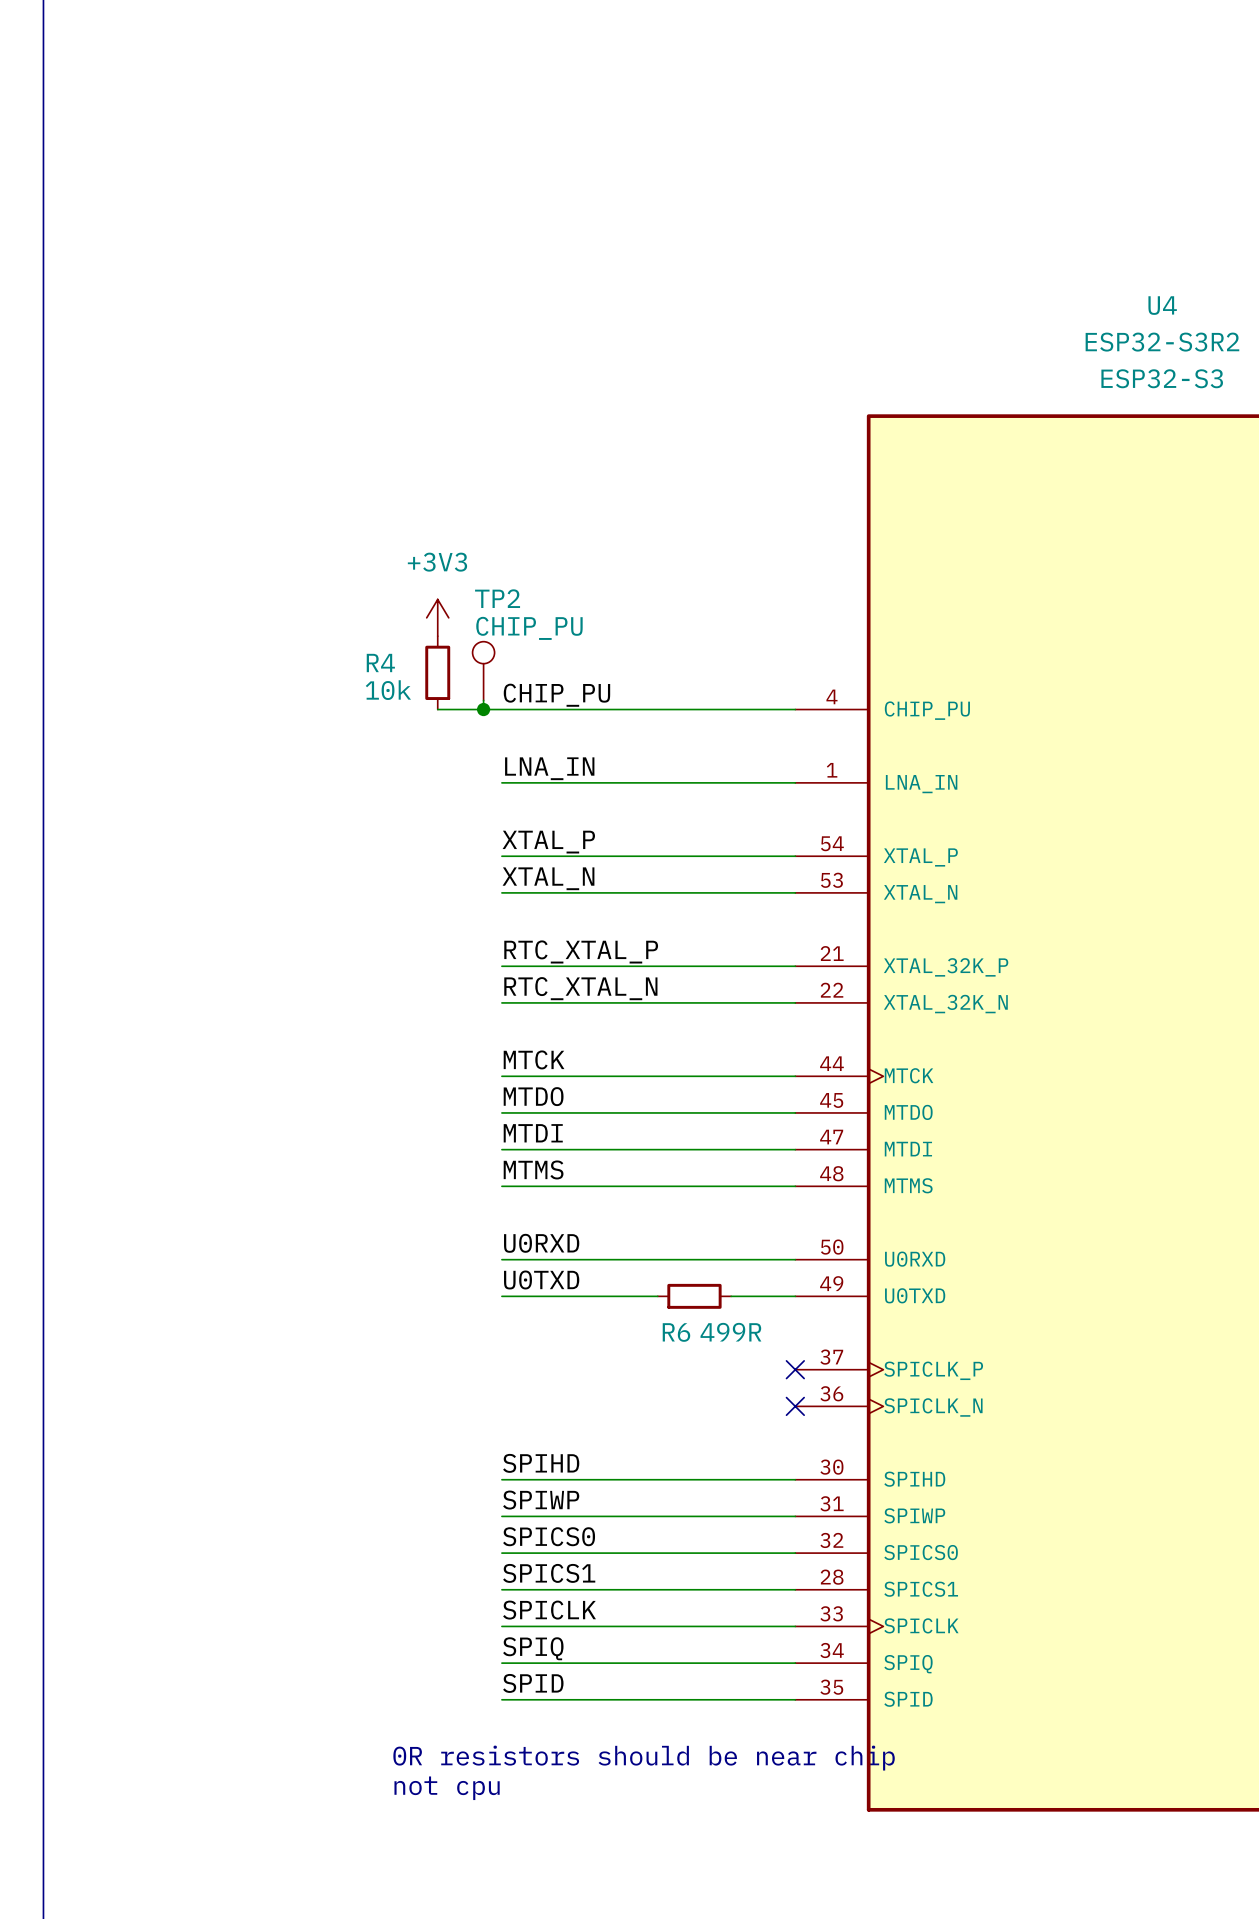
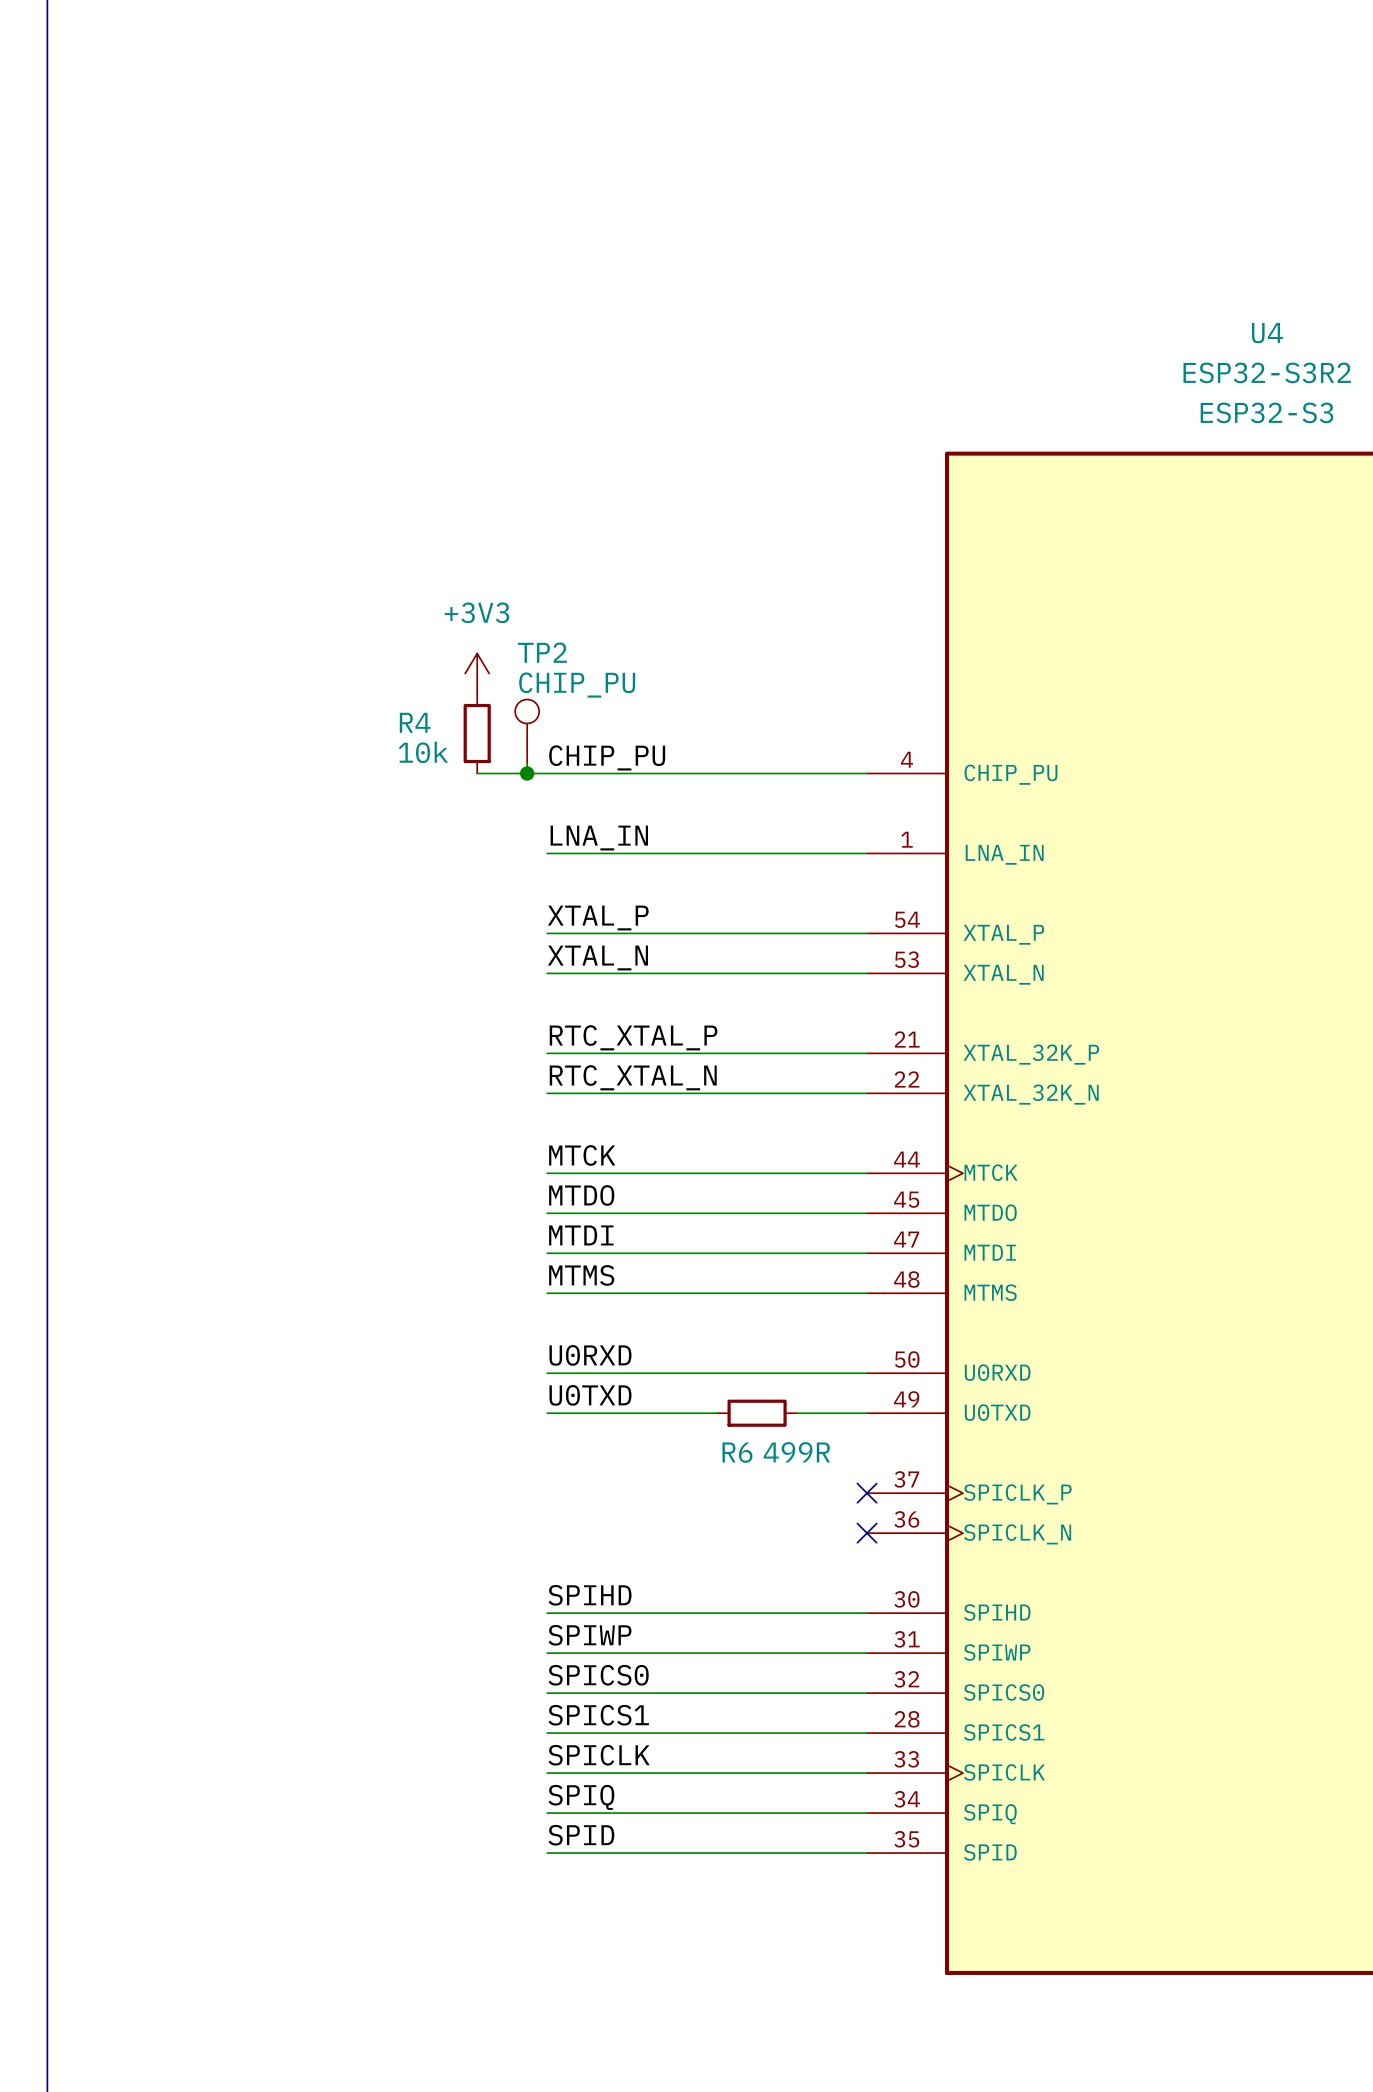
text: 0R resistors should be near chip (644, 1758) -> none
text: not cpu (447, 1788) -> none

